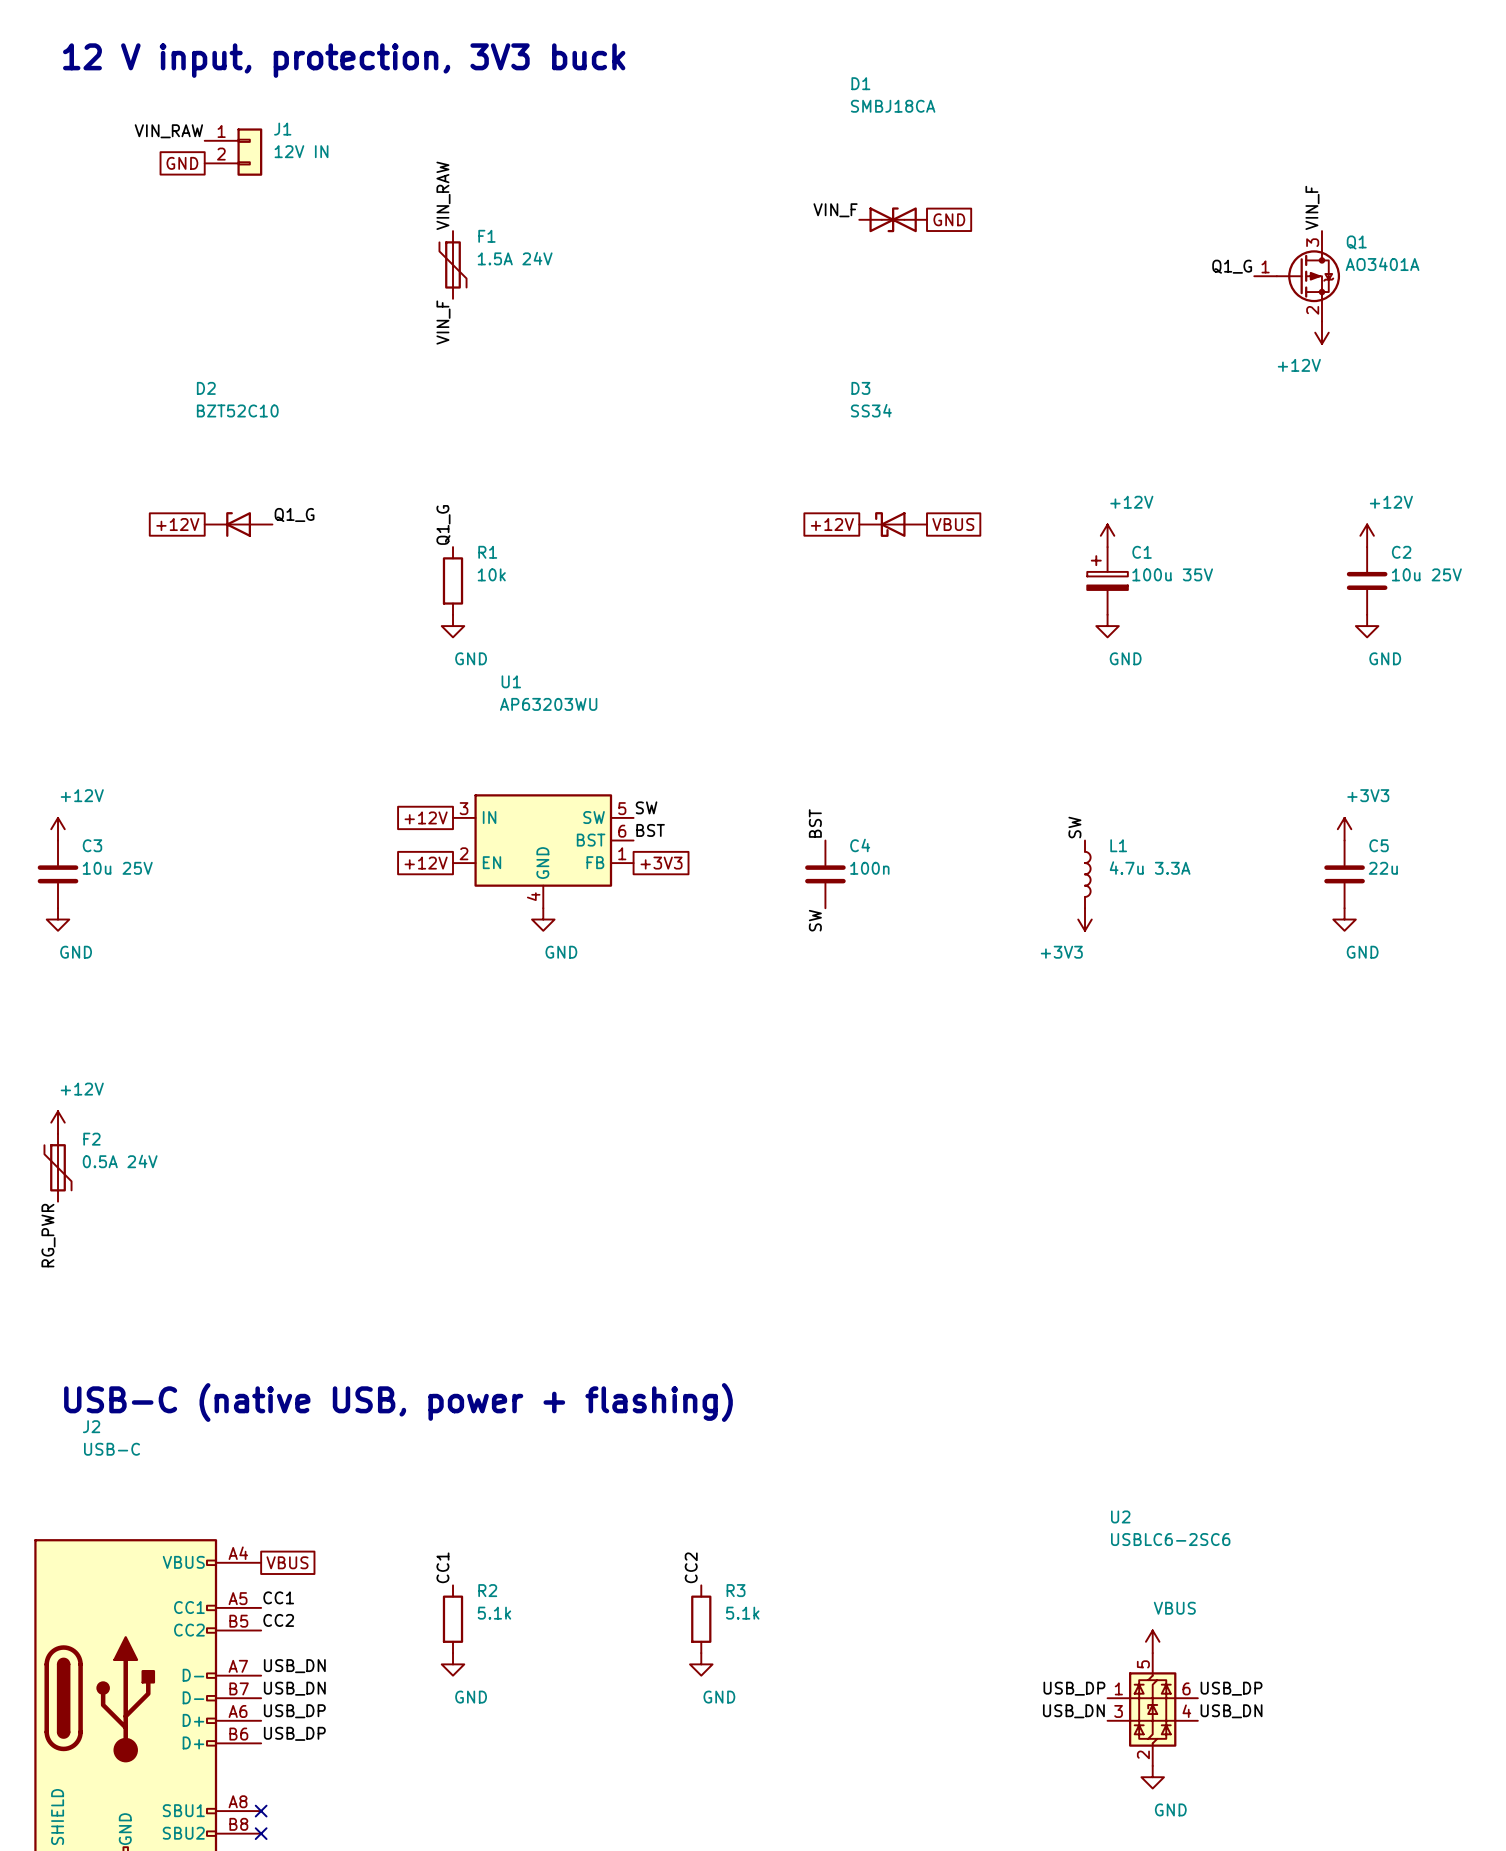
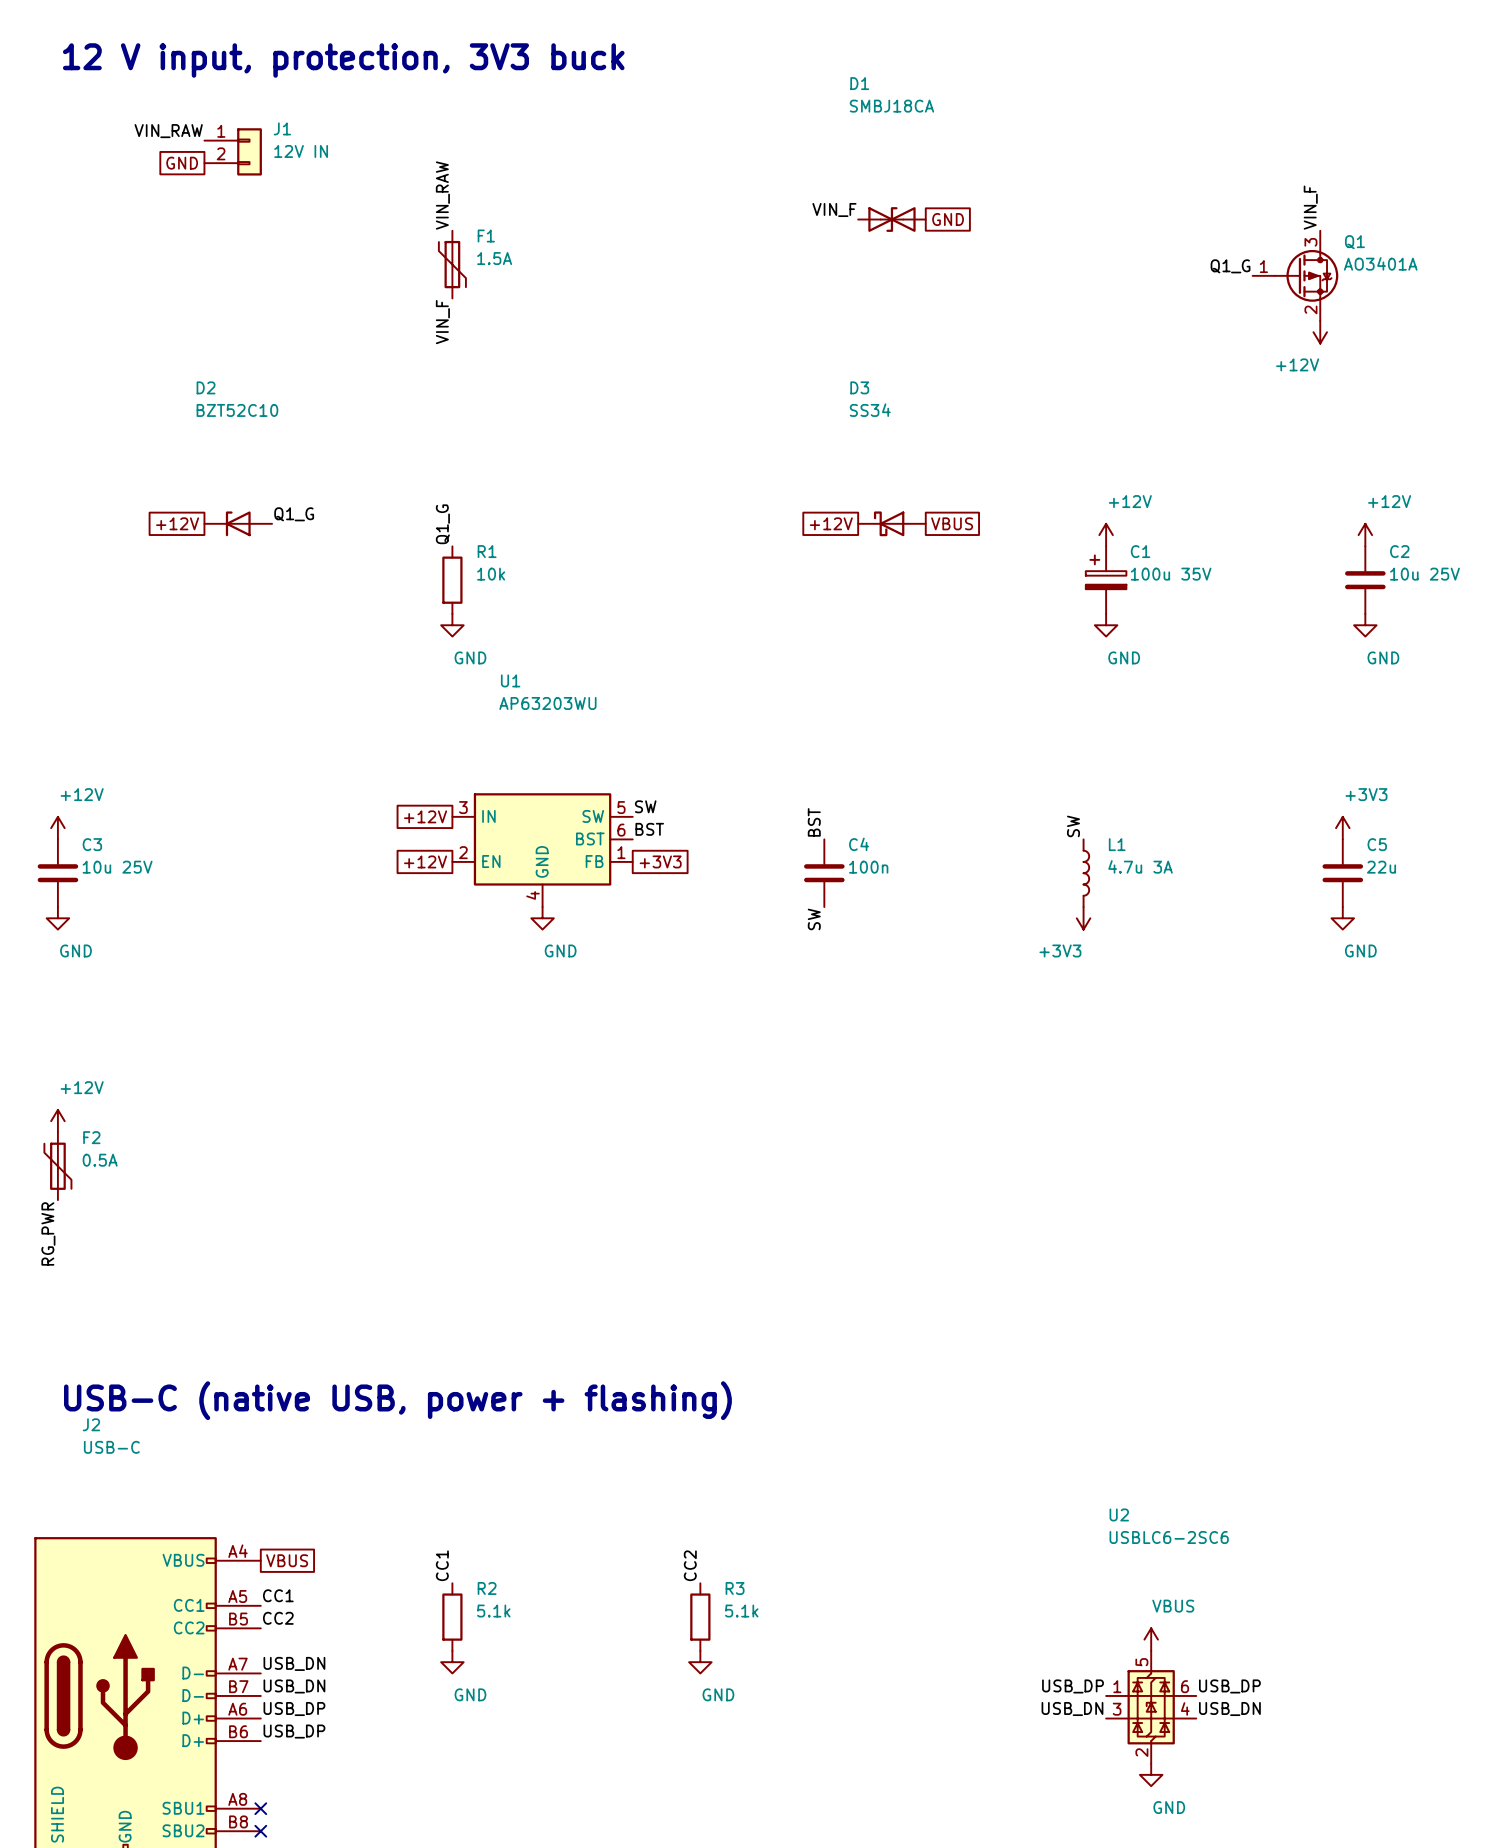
F1 value: 1.5A 24V (515, 258) -> 1.5A (494, 258)
L1 value: 4.7u 3.3A (1150, 868) -> 4.7u 3A (1140, 866)
F2 value: 0.5A 24V (120, 1161) -> 0.5A (100, 1160)

